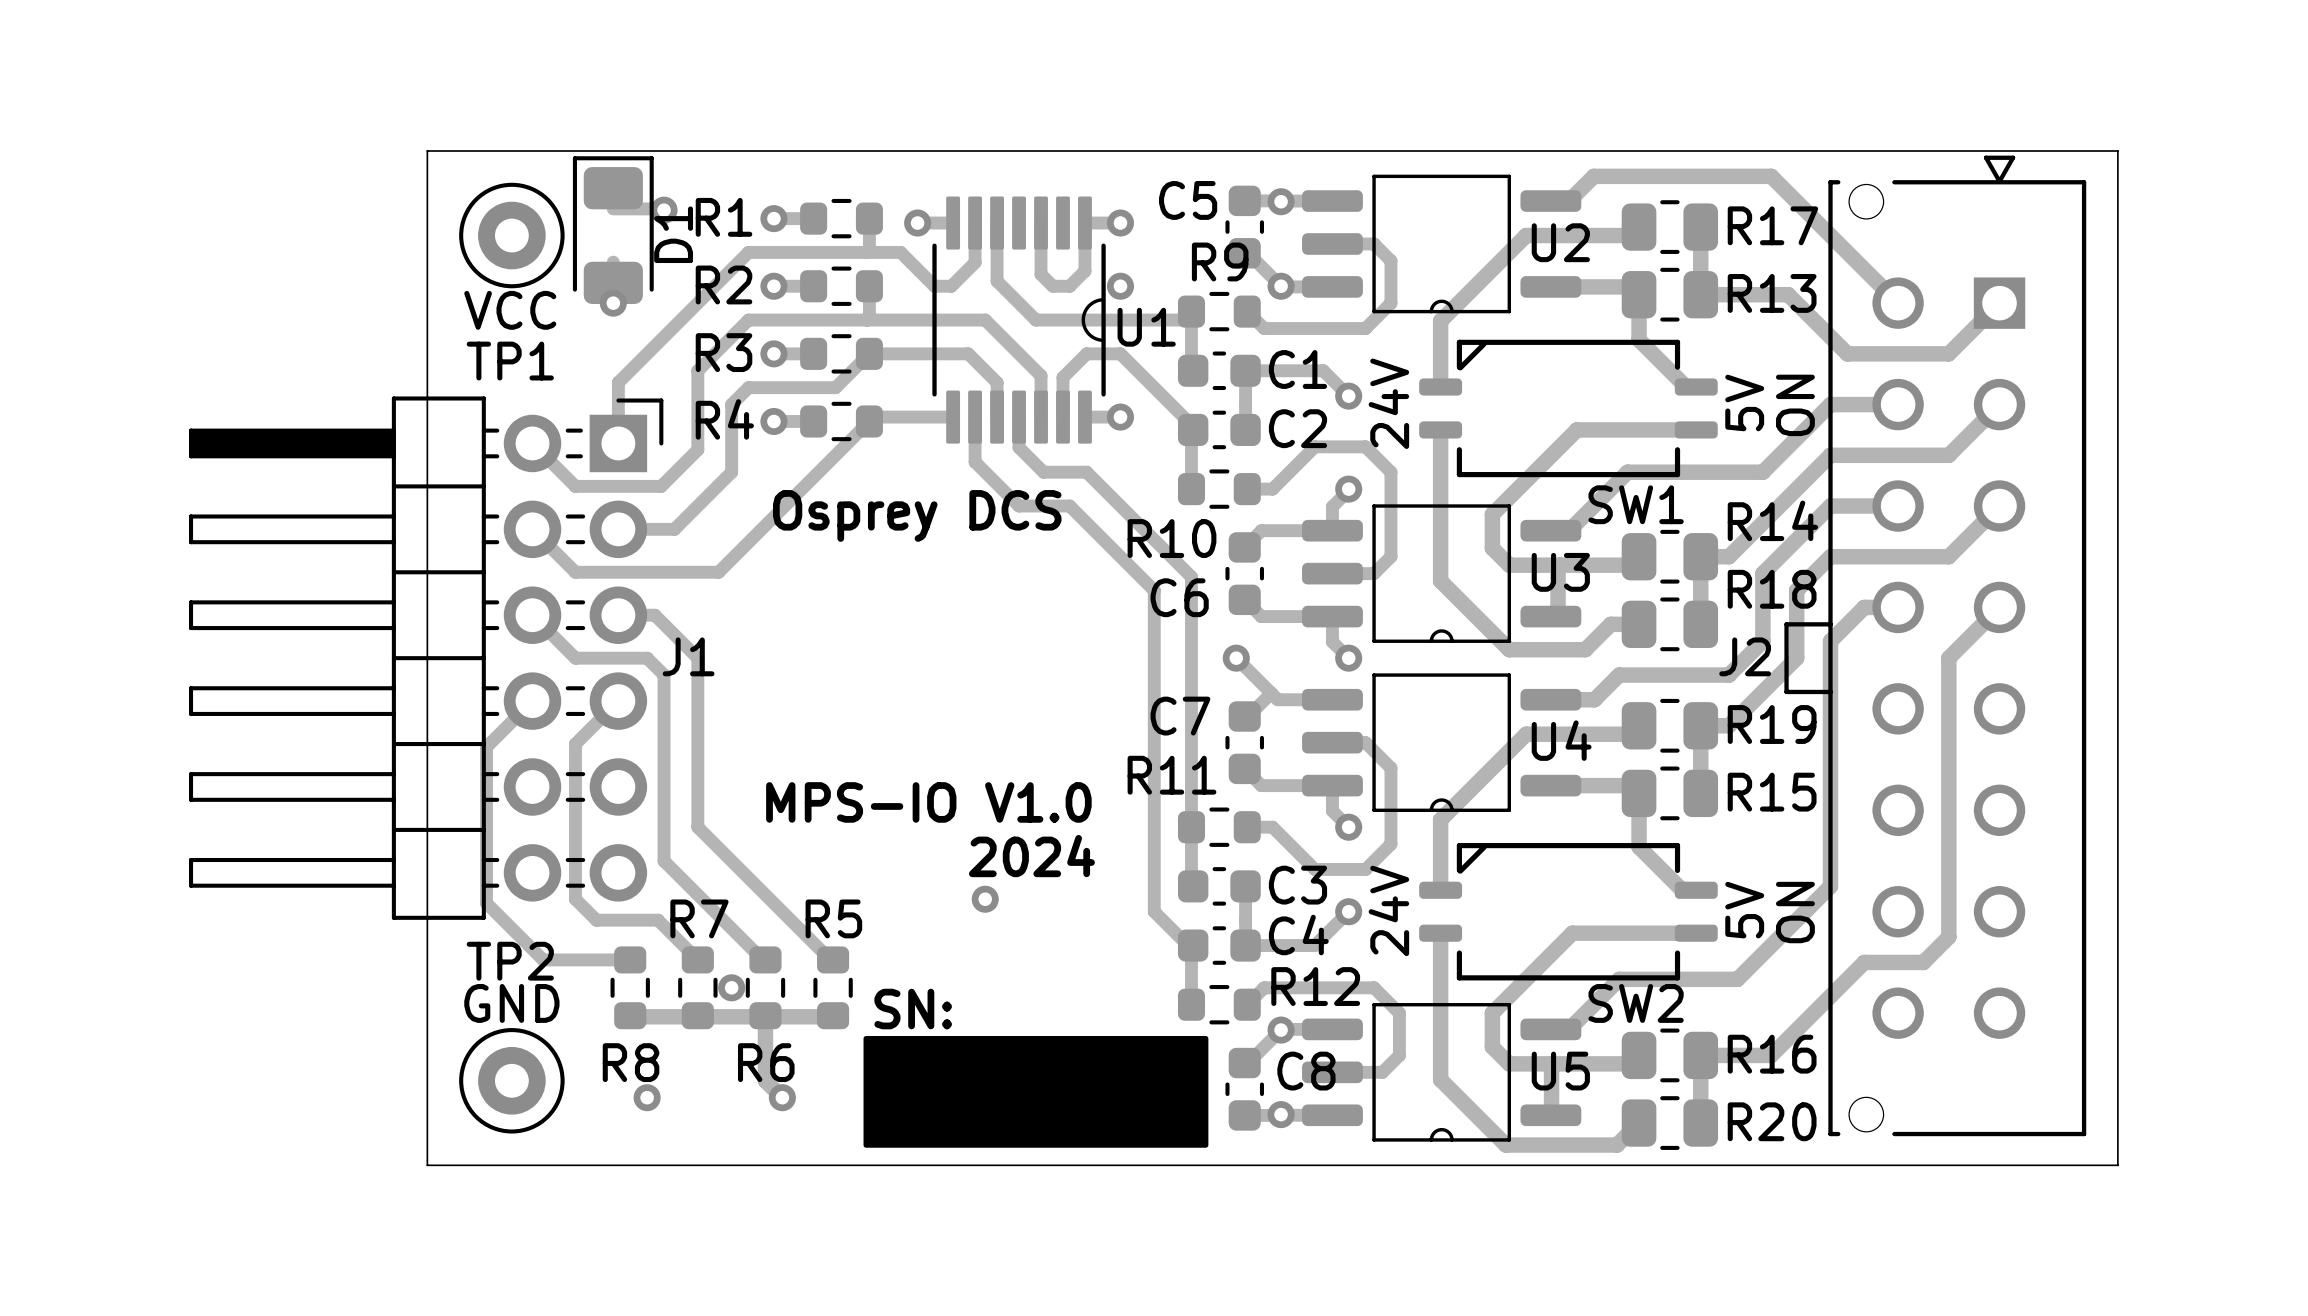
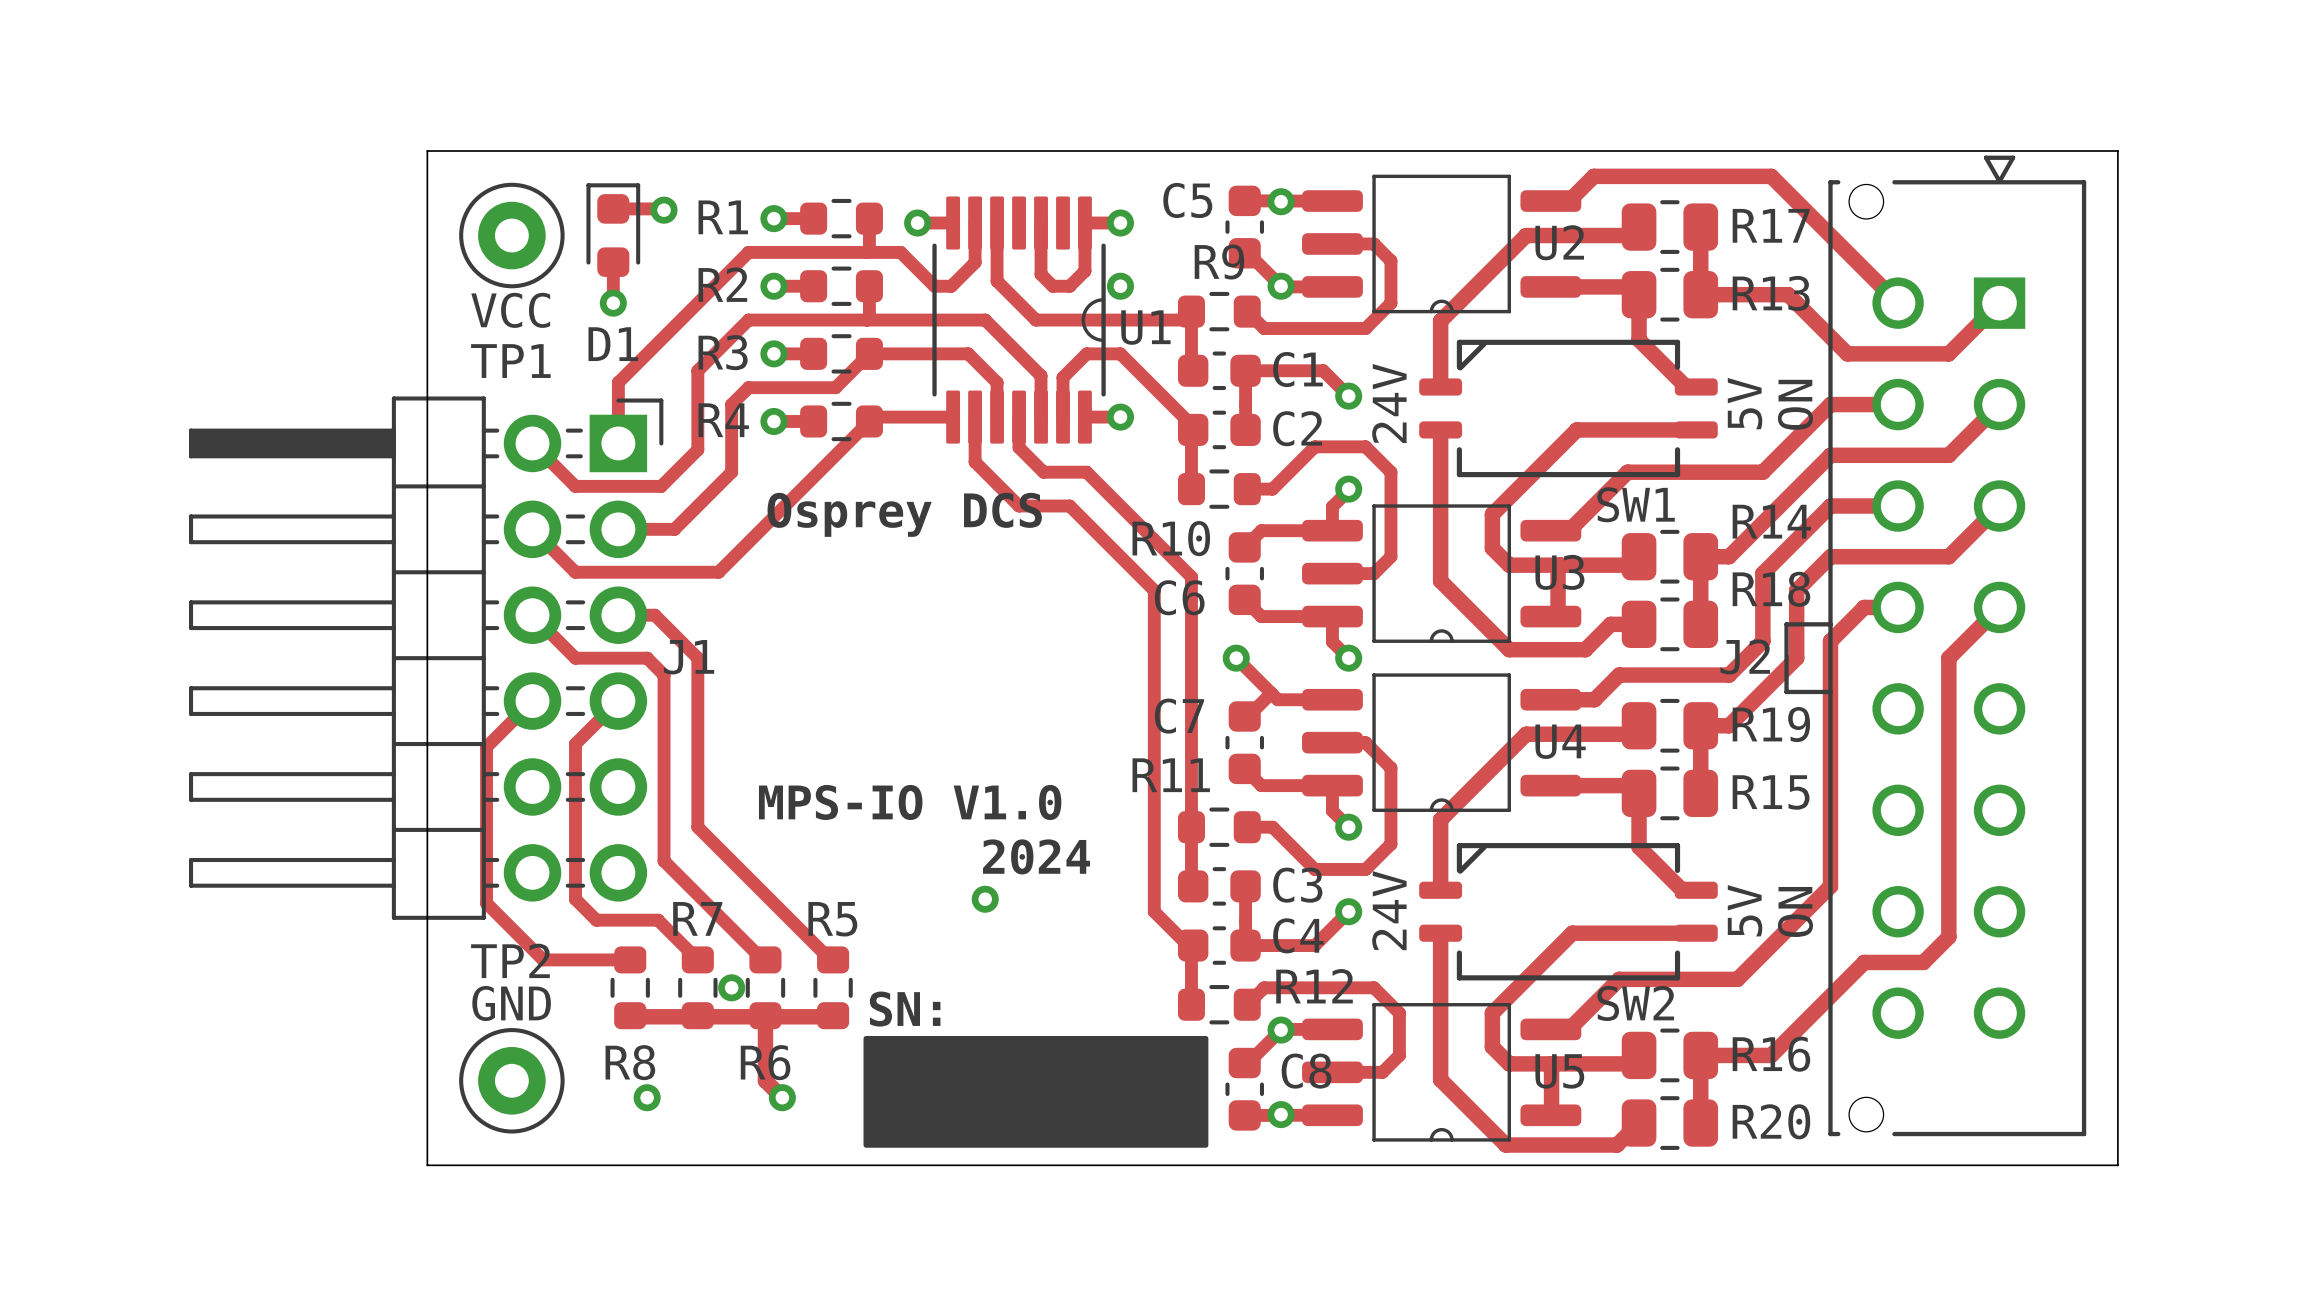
D1 footprint: [572, 156, 654, 304] -> [586, 183, 641, 277]
D1 name rotation: 0° (673, 234) -> 90° clockwise (613, 344)
D1 name position: D1 (673, 234) -> D1 (613, 344)

